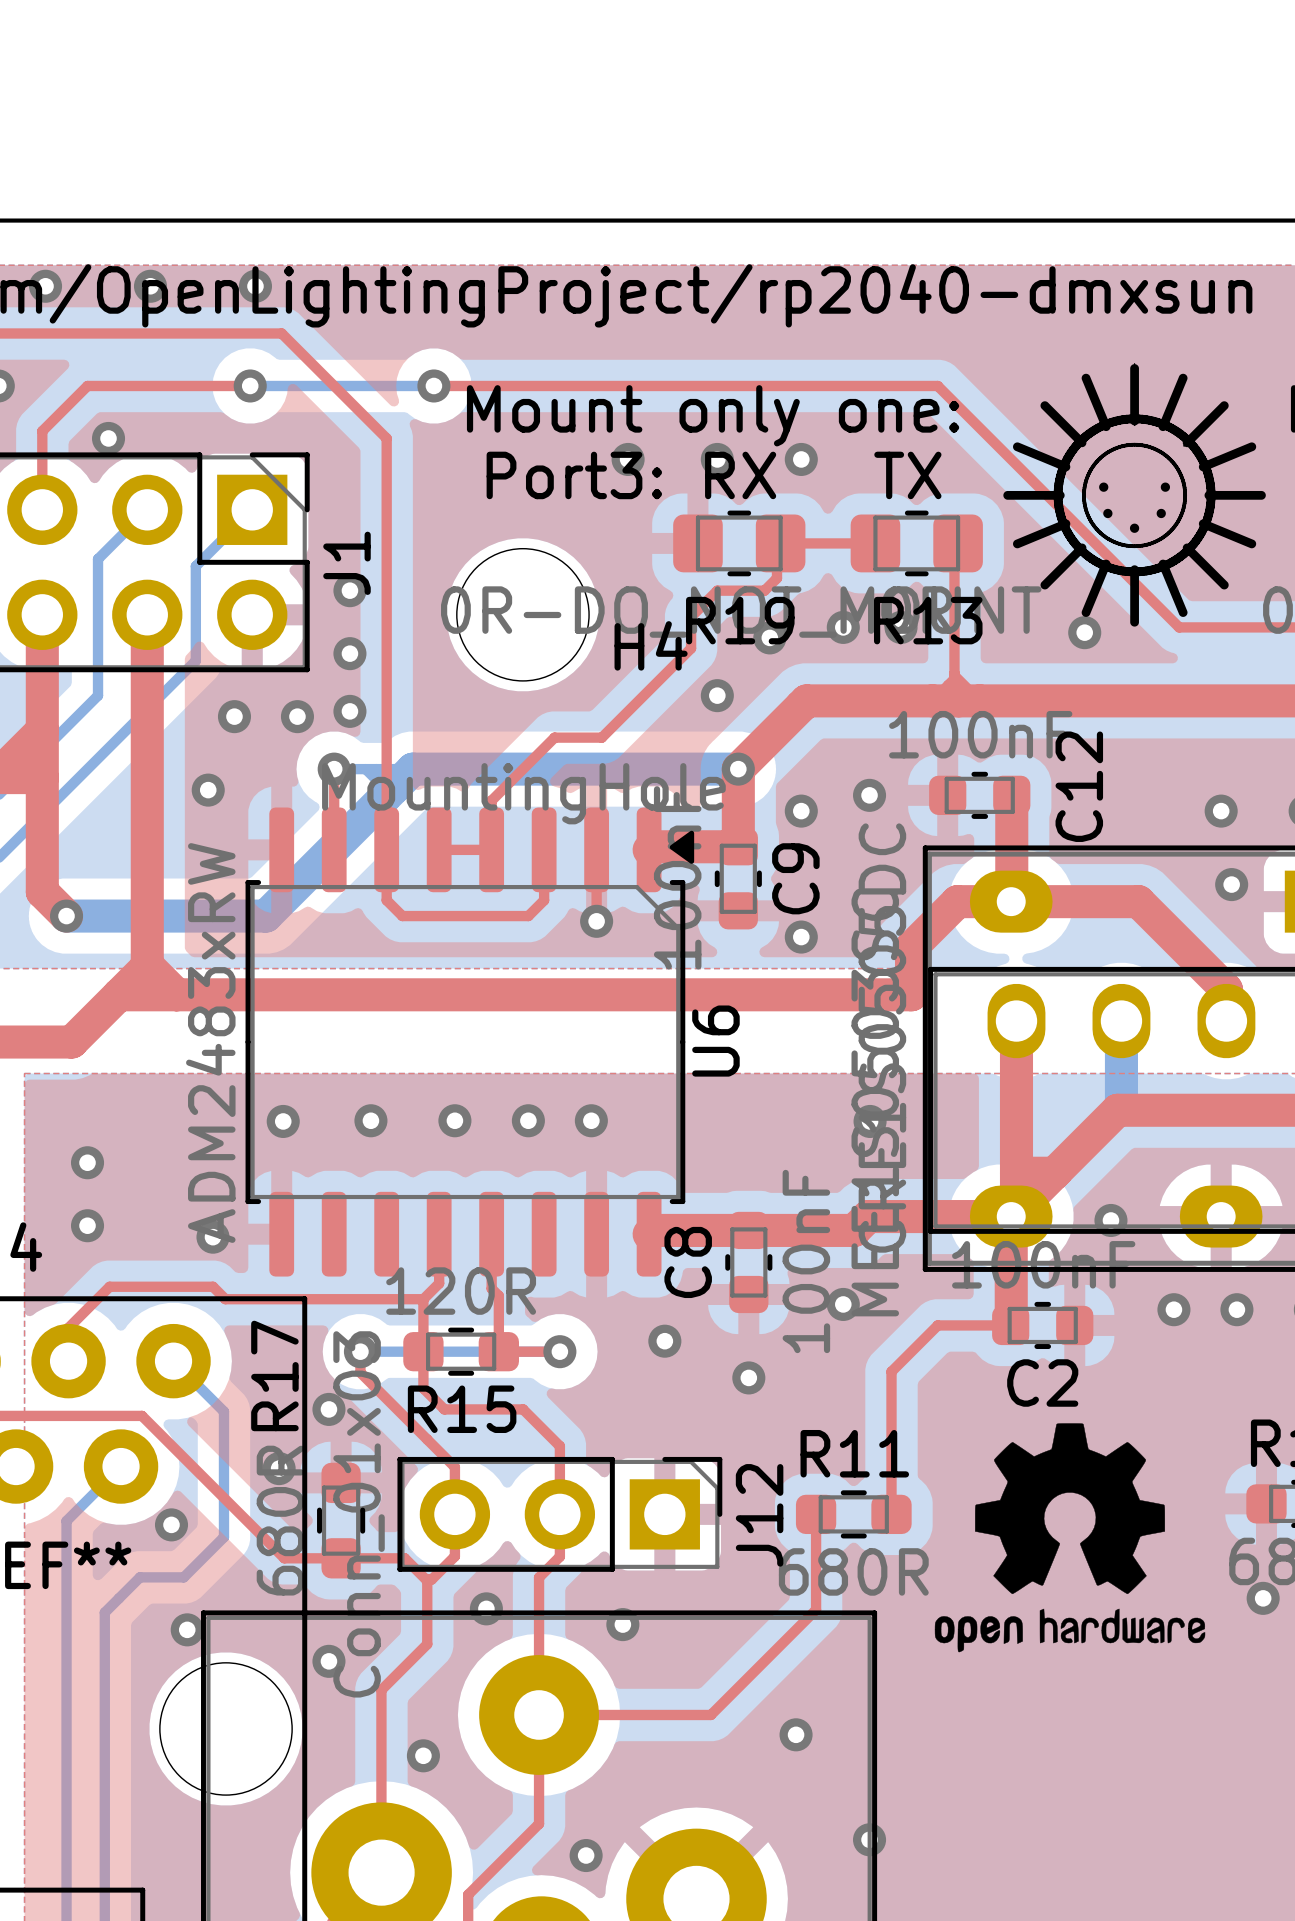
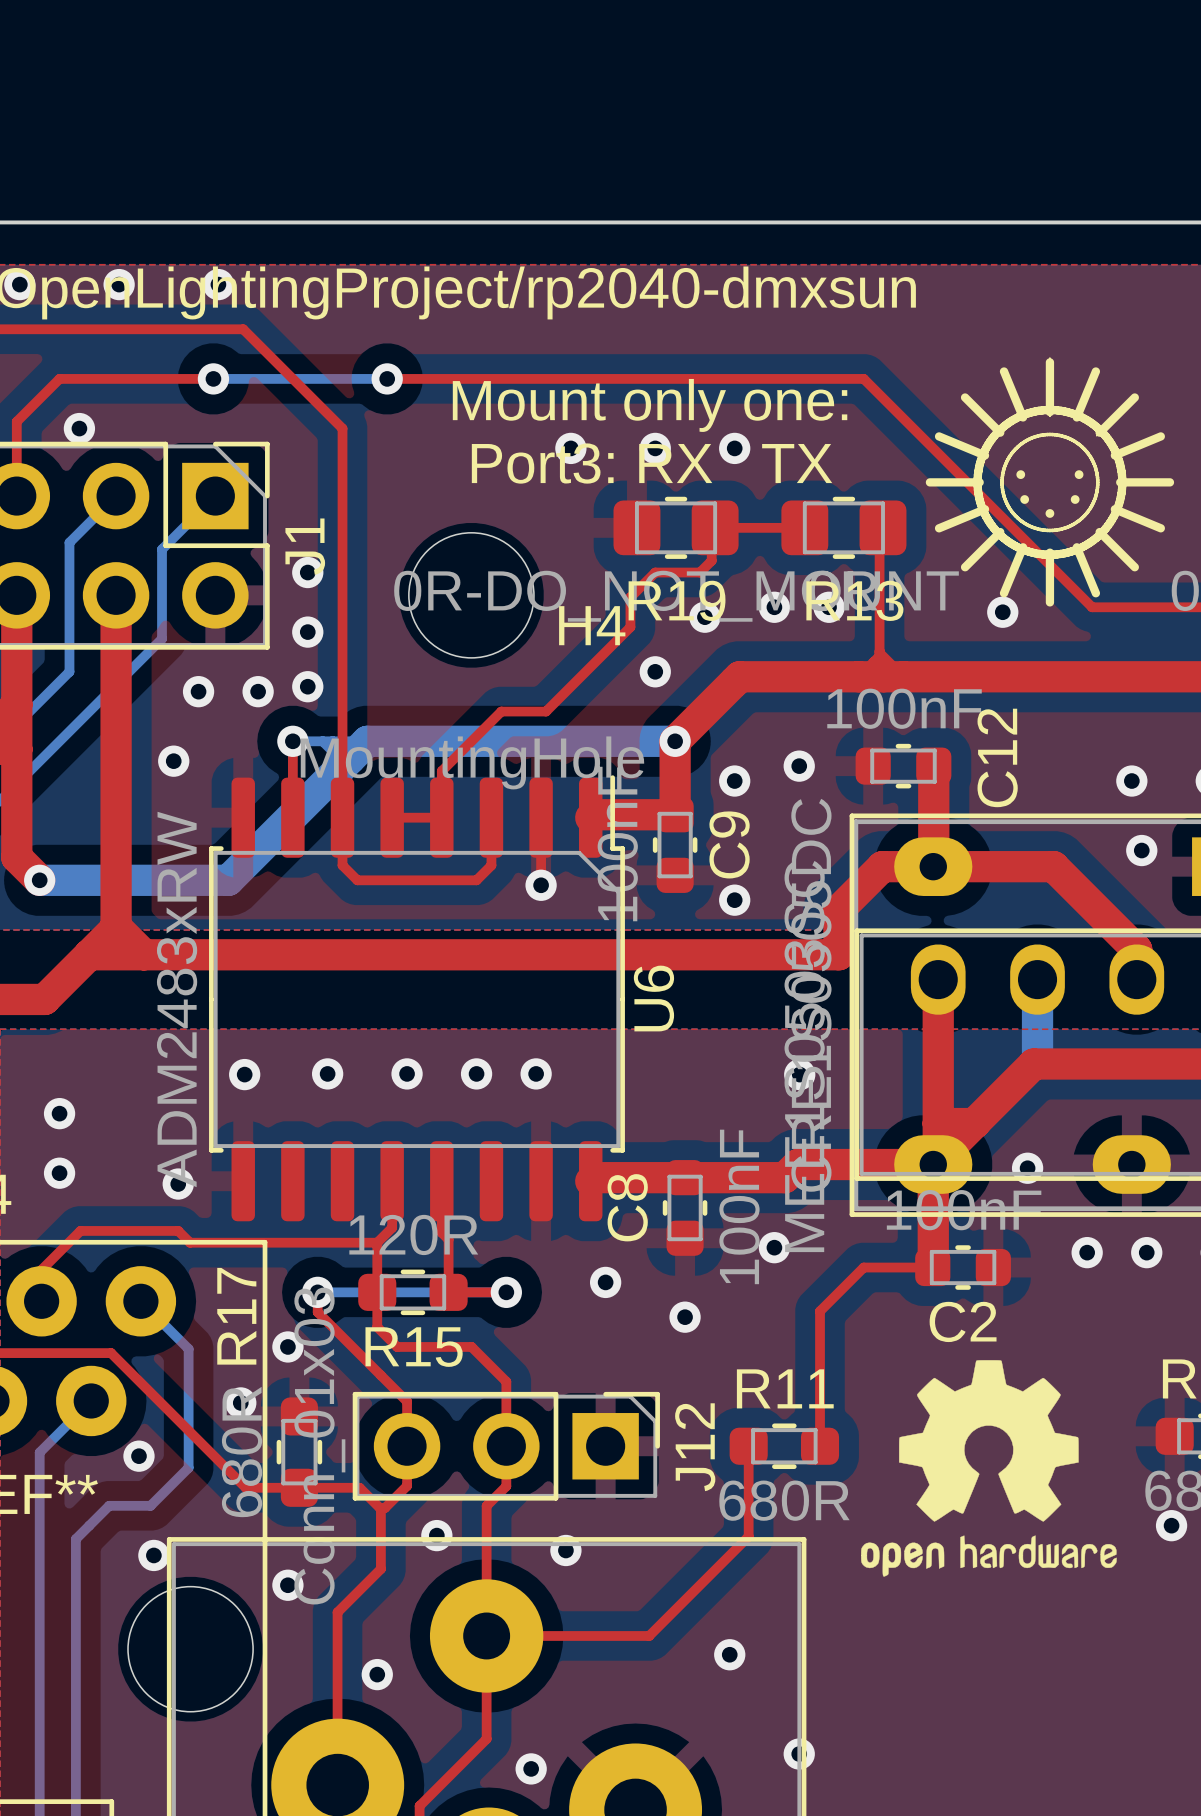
U6 footprint: [245, 807, 695, 1277] -> [209, 775, 625, 1222]

